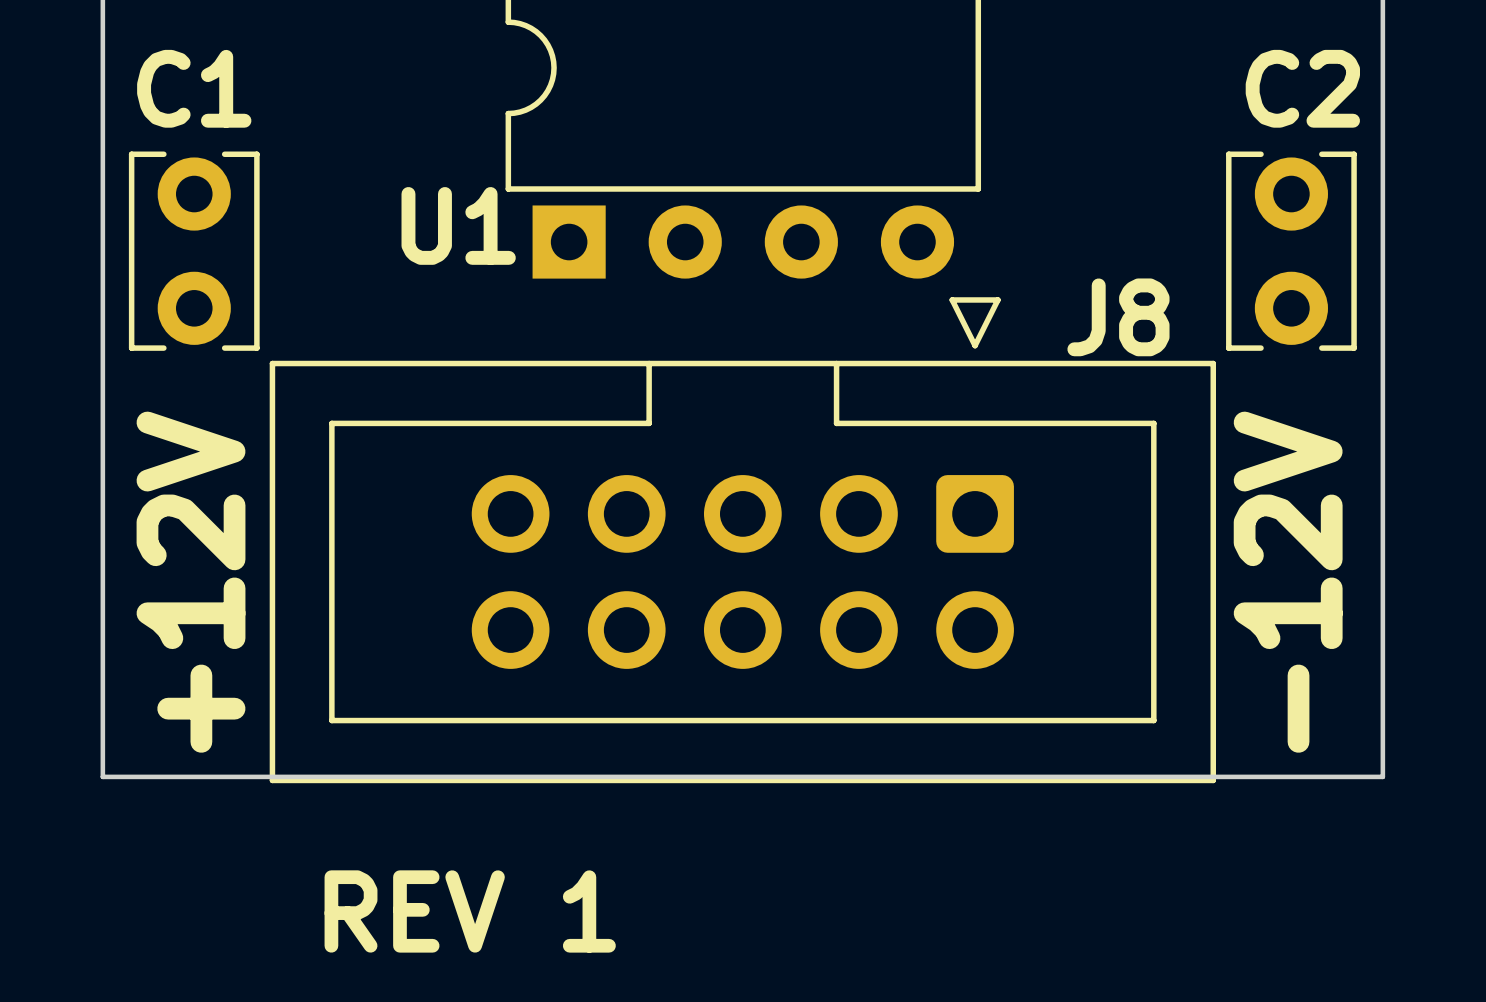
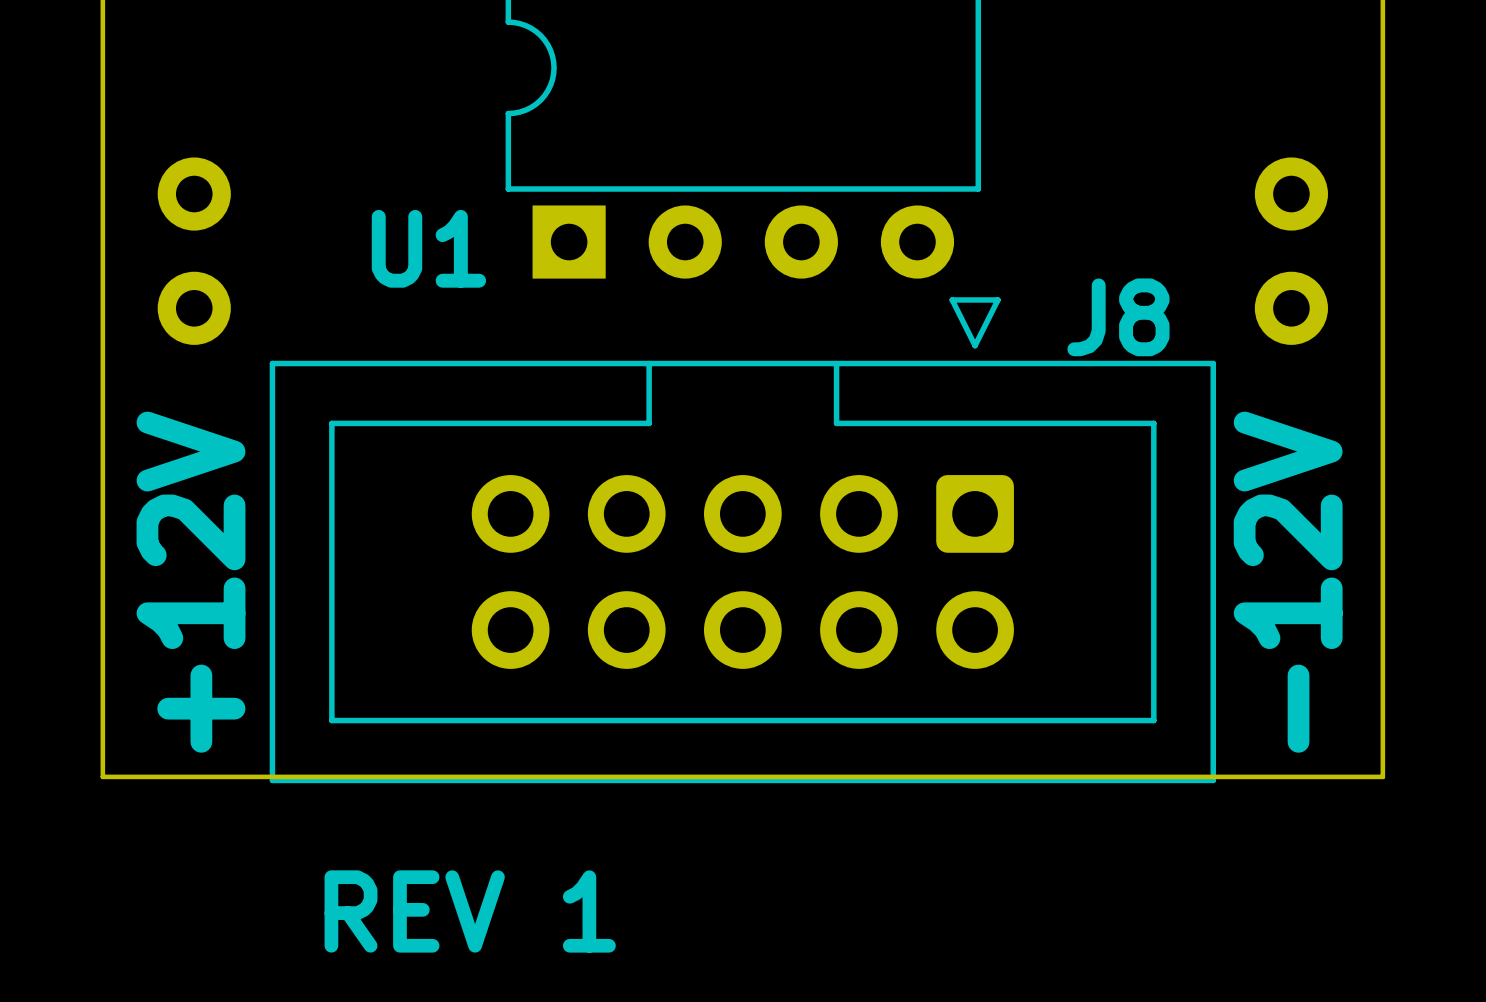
U1 name position: U1 (458, 225) -> U1 (428, 248)
C1 side: bottom (194, 251) -> top (194, 251)
C2 side: bottom (1291, 251) -> top (1291, 251)

